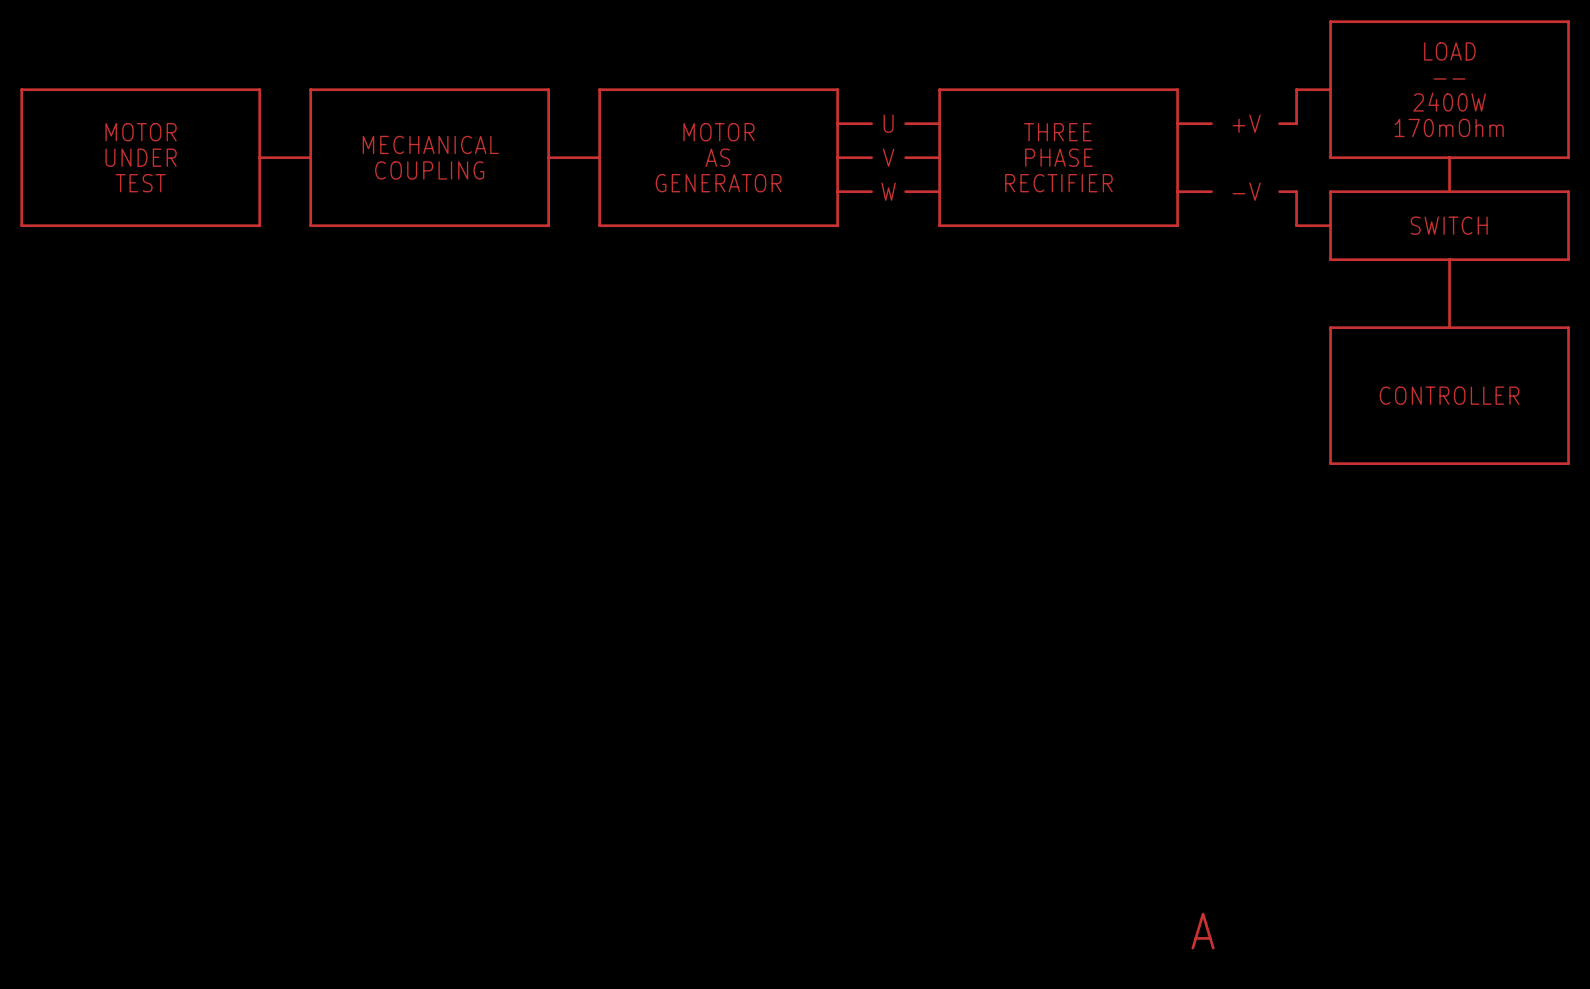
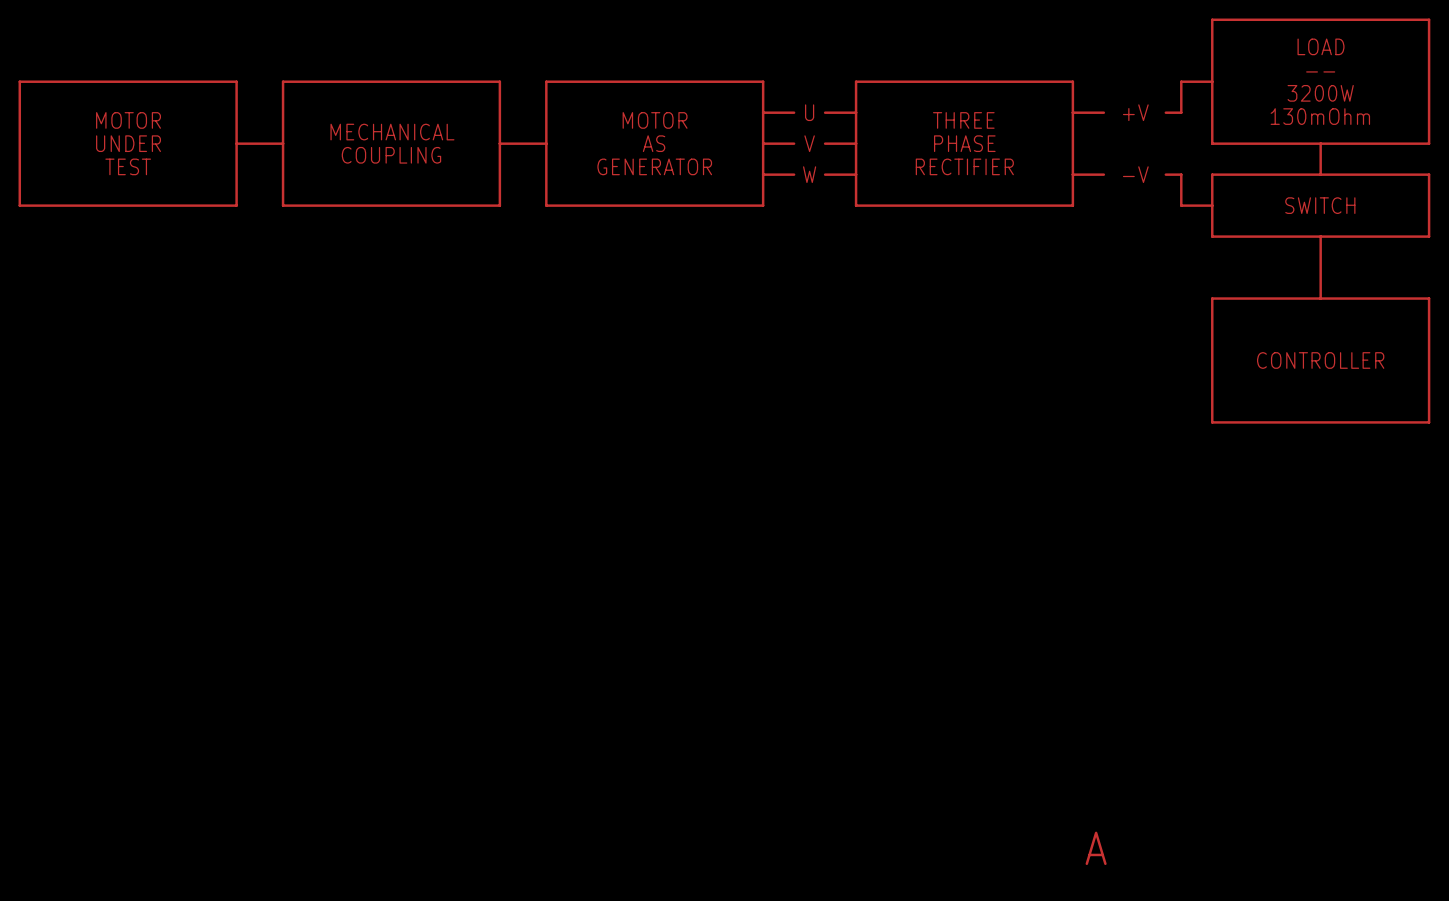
text: 2400W (1449, 102) -> 3200W (1320, 93)
text: 170mOhm (1449, 127) -> 130mOhm (1320, 116)

